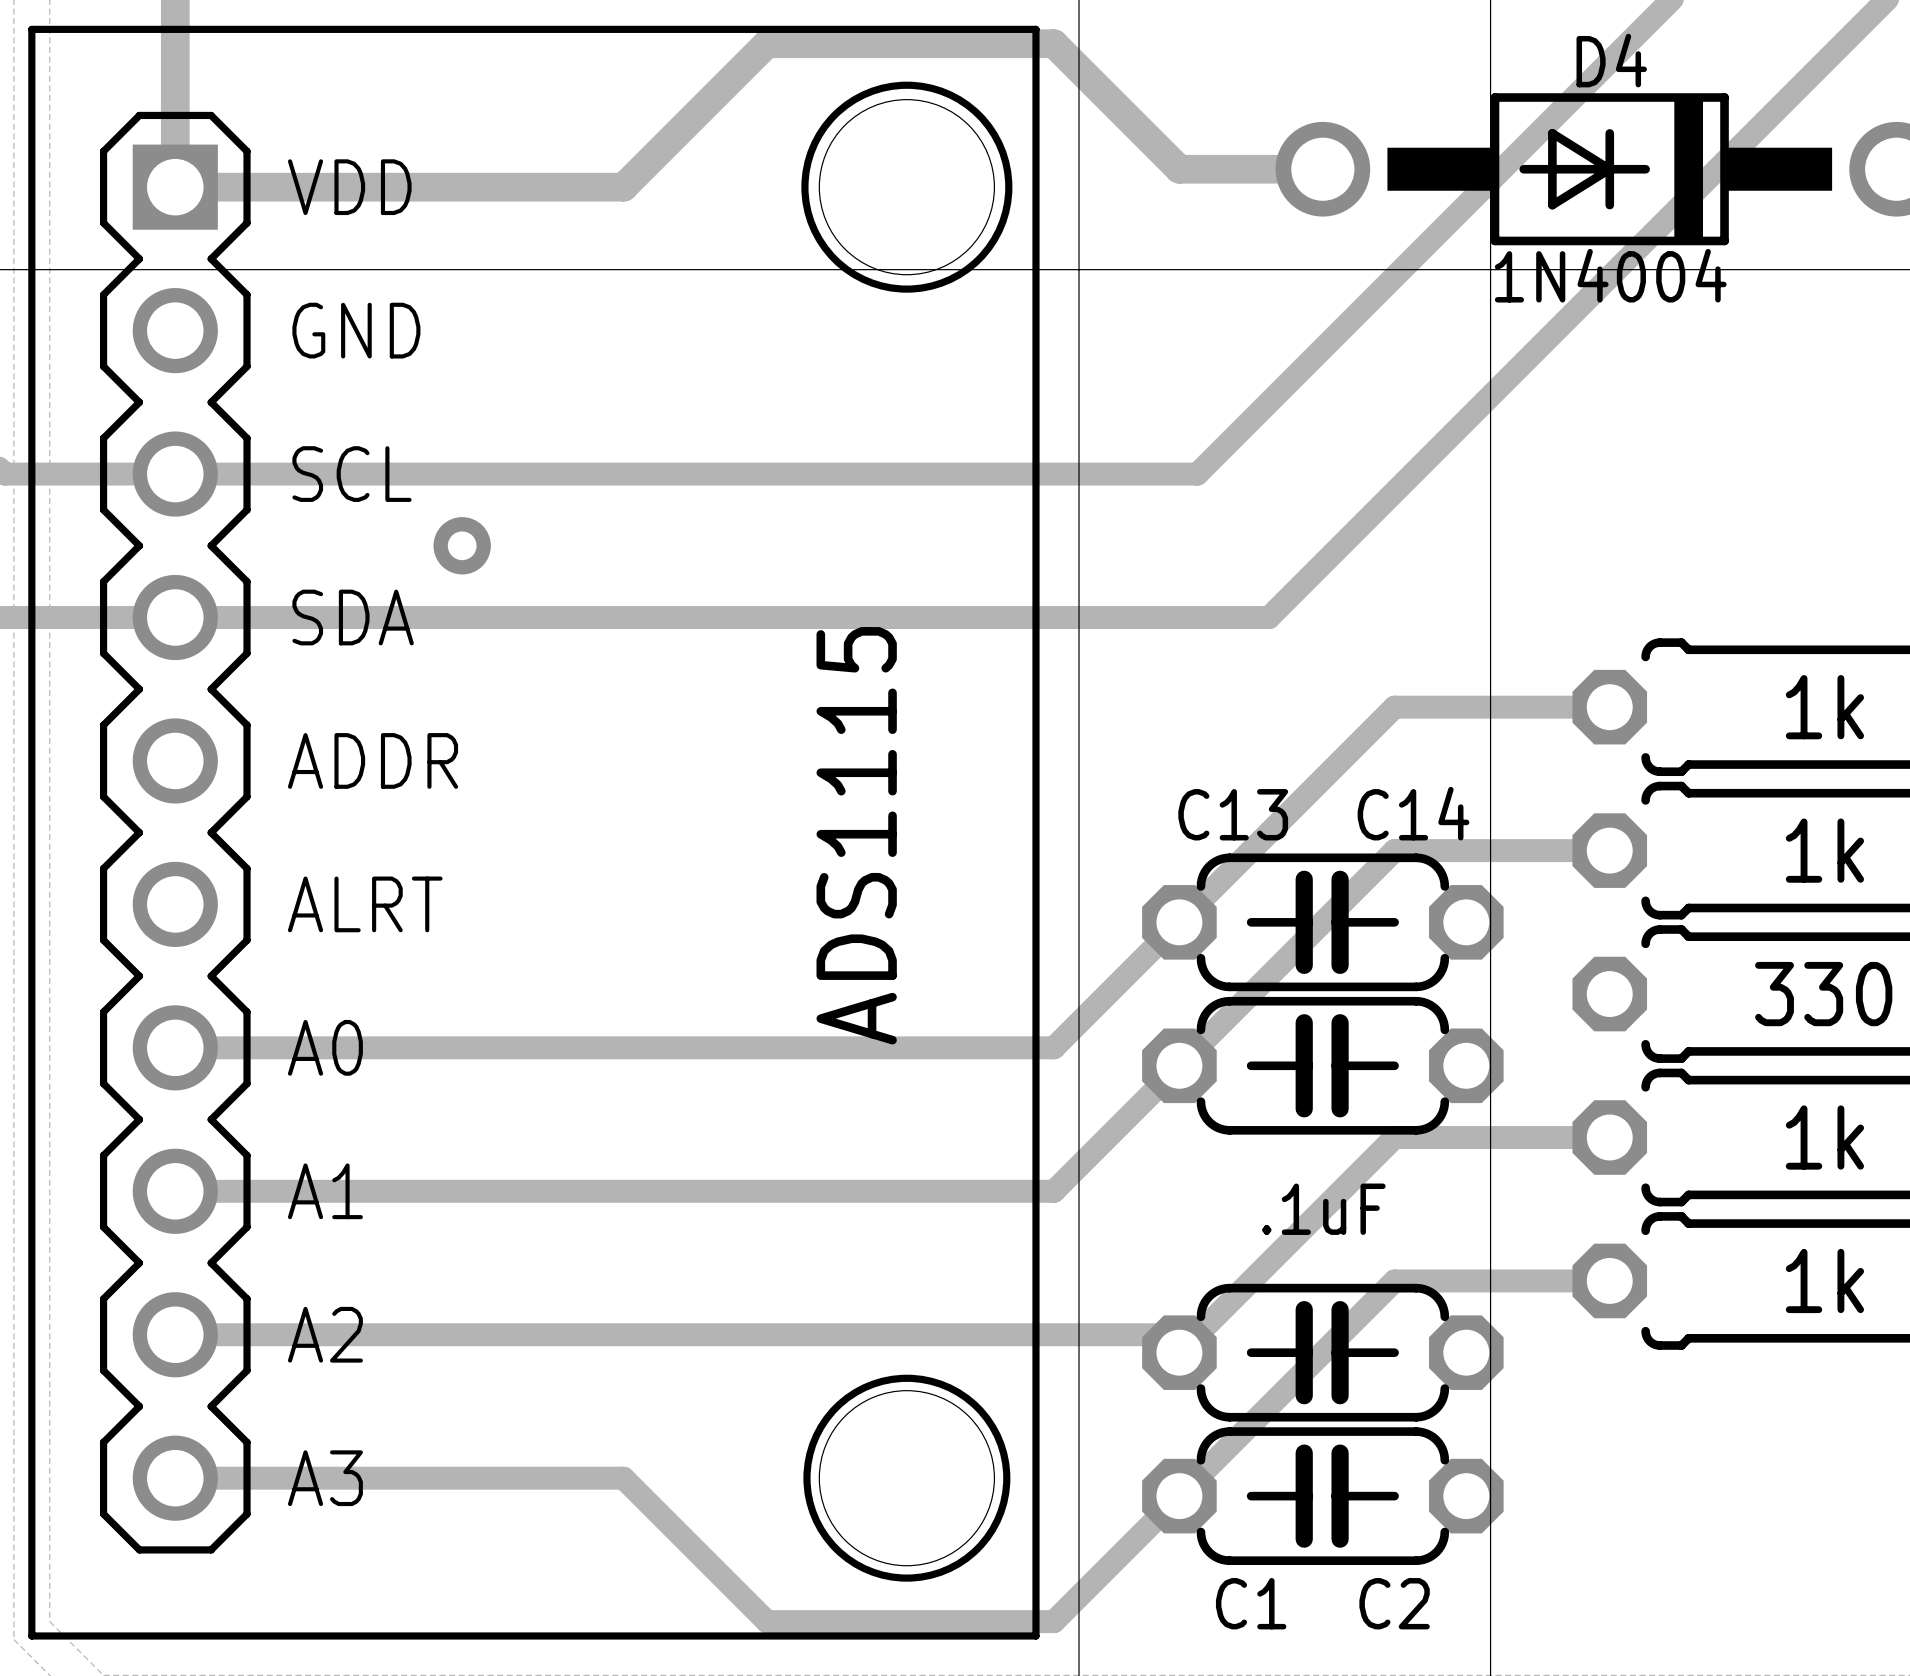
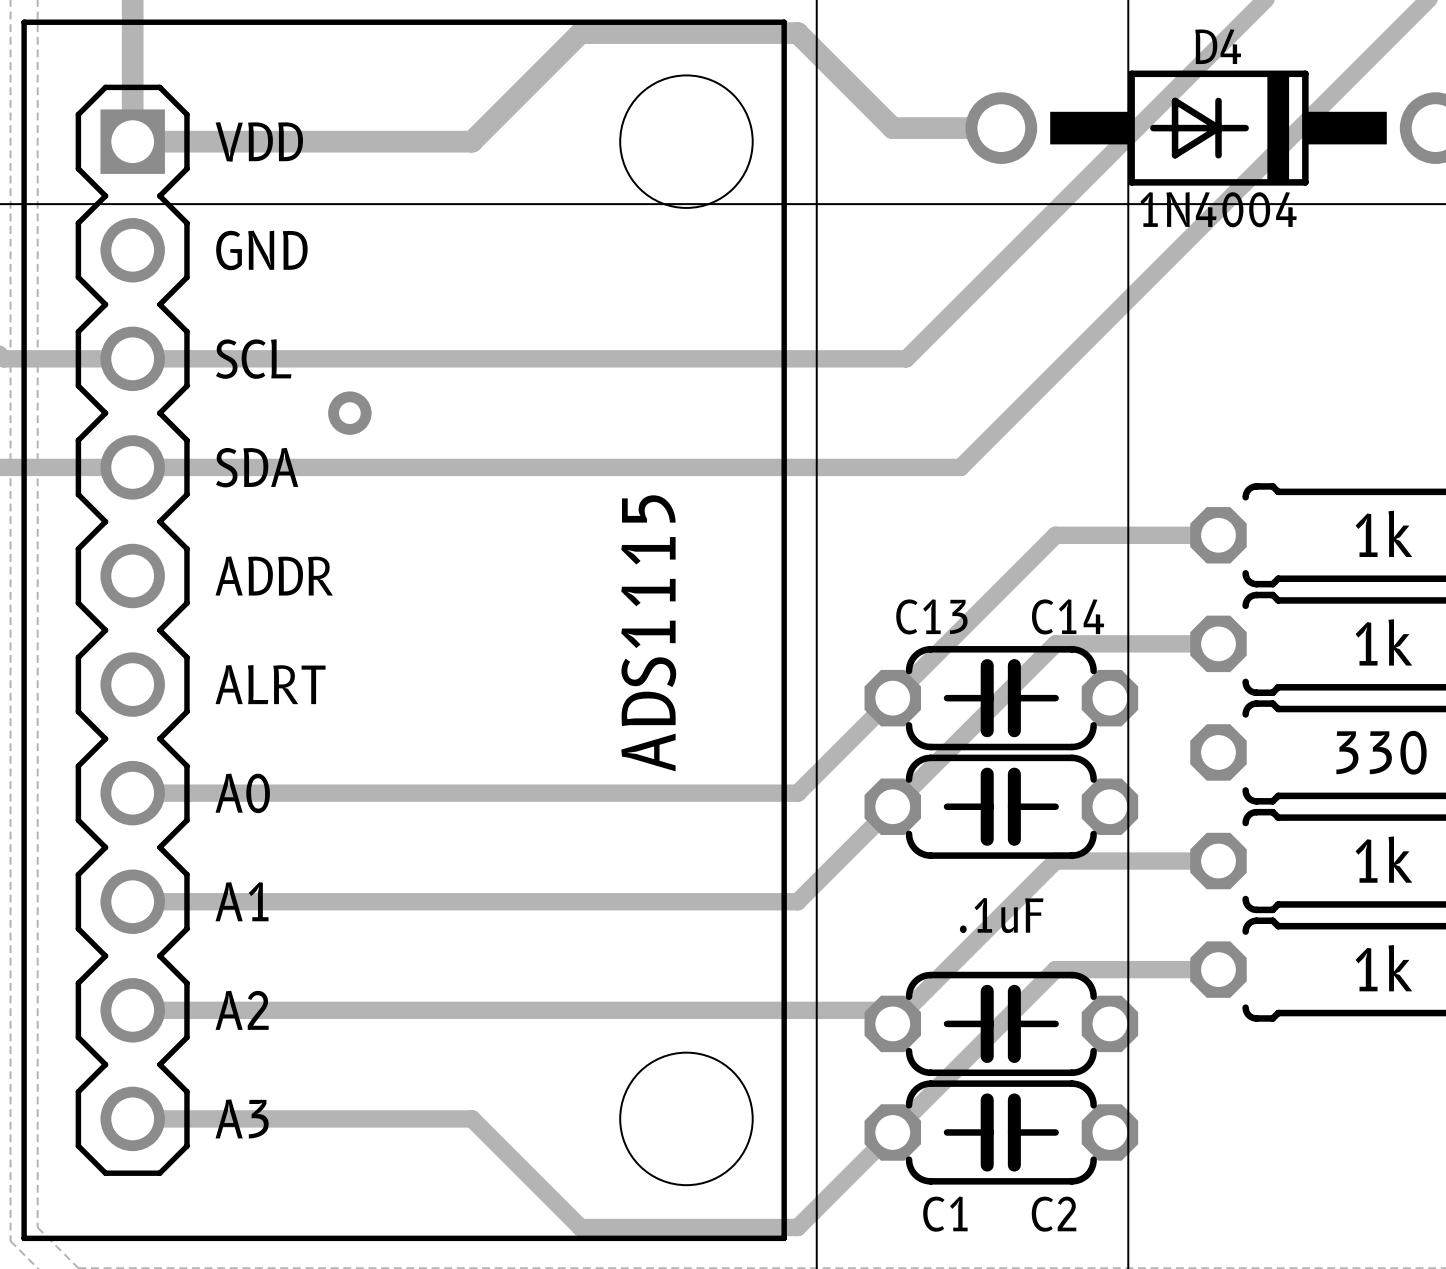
part footprint: [28, 25, 1040, 1640] -> [21, 19, 787, 1242]

